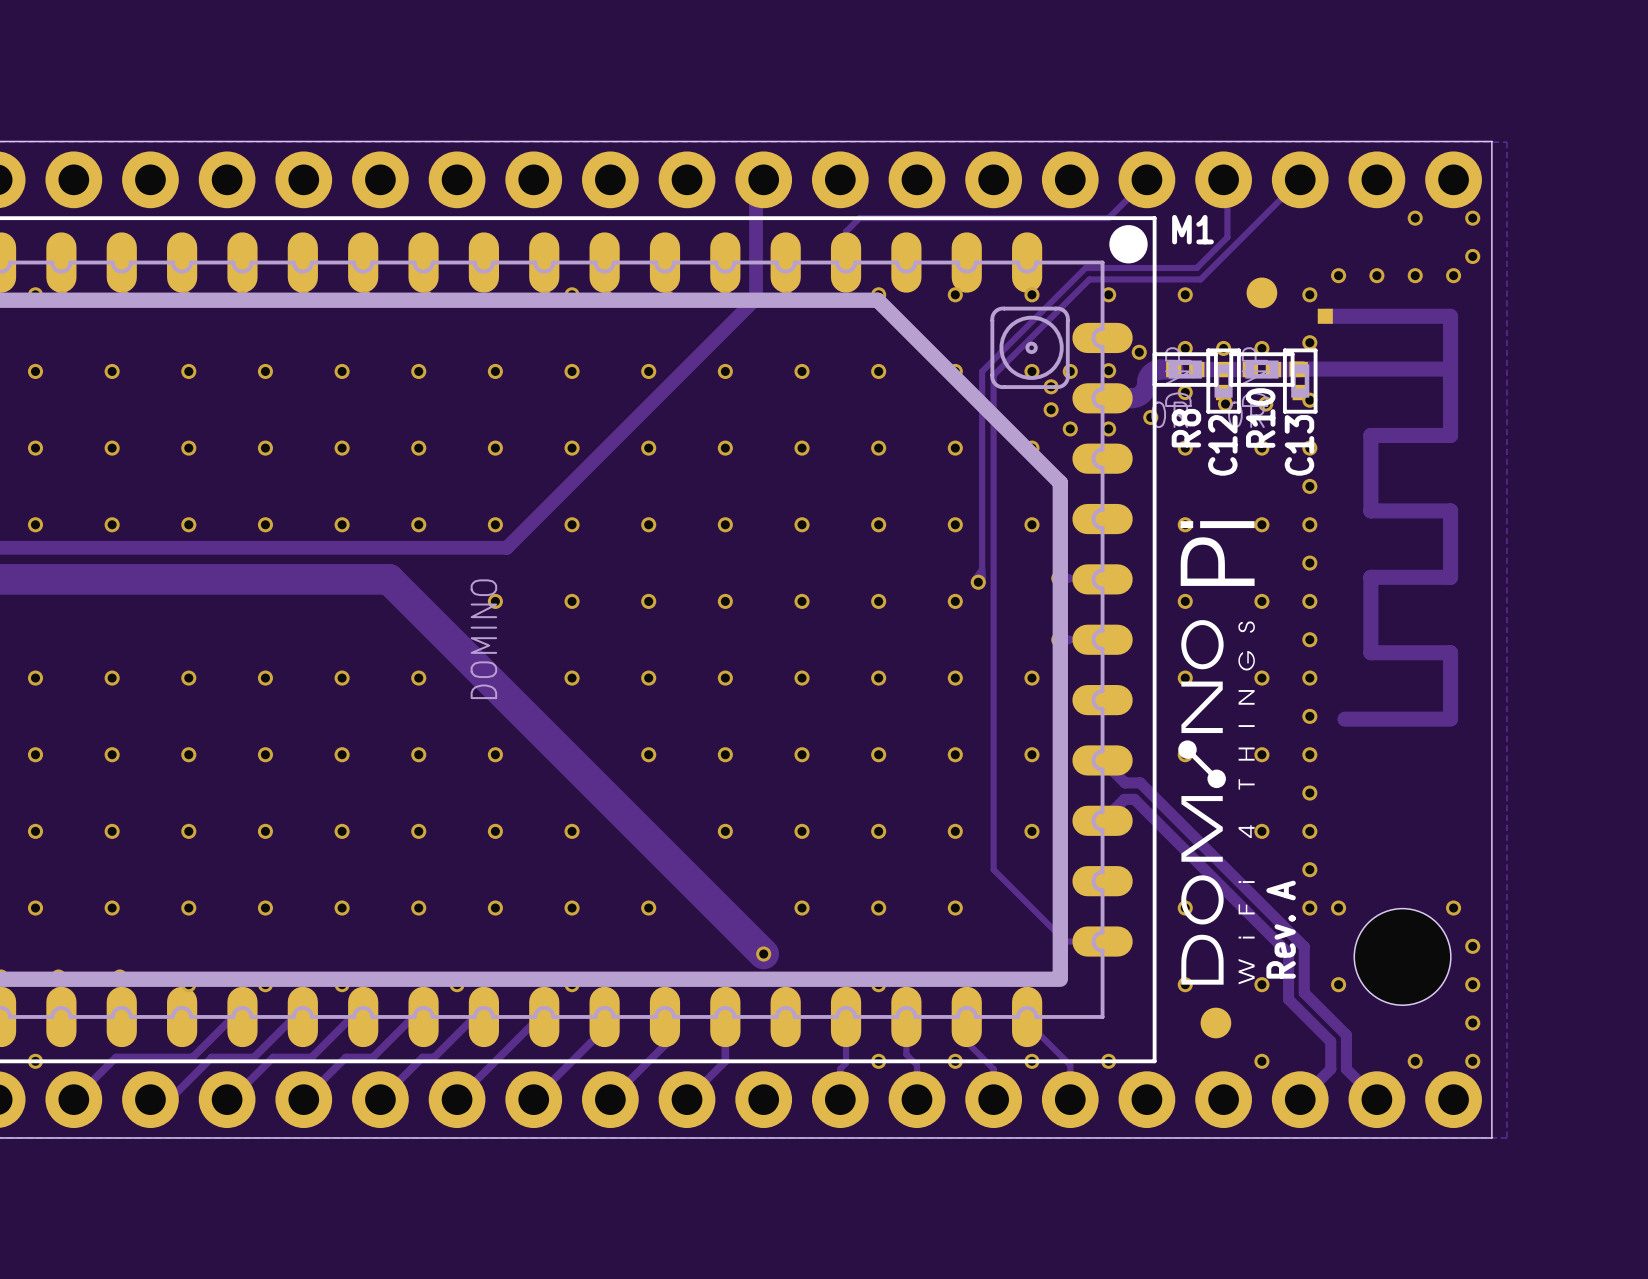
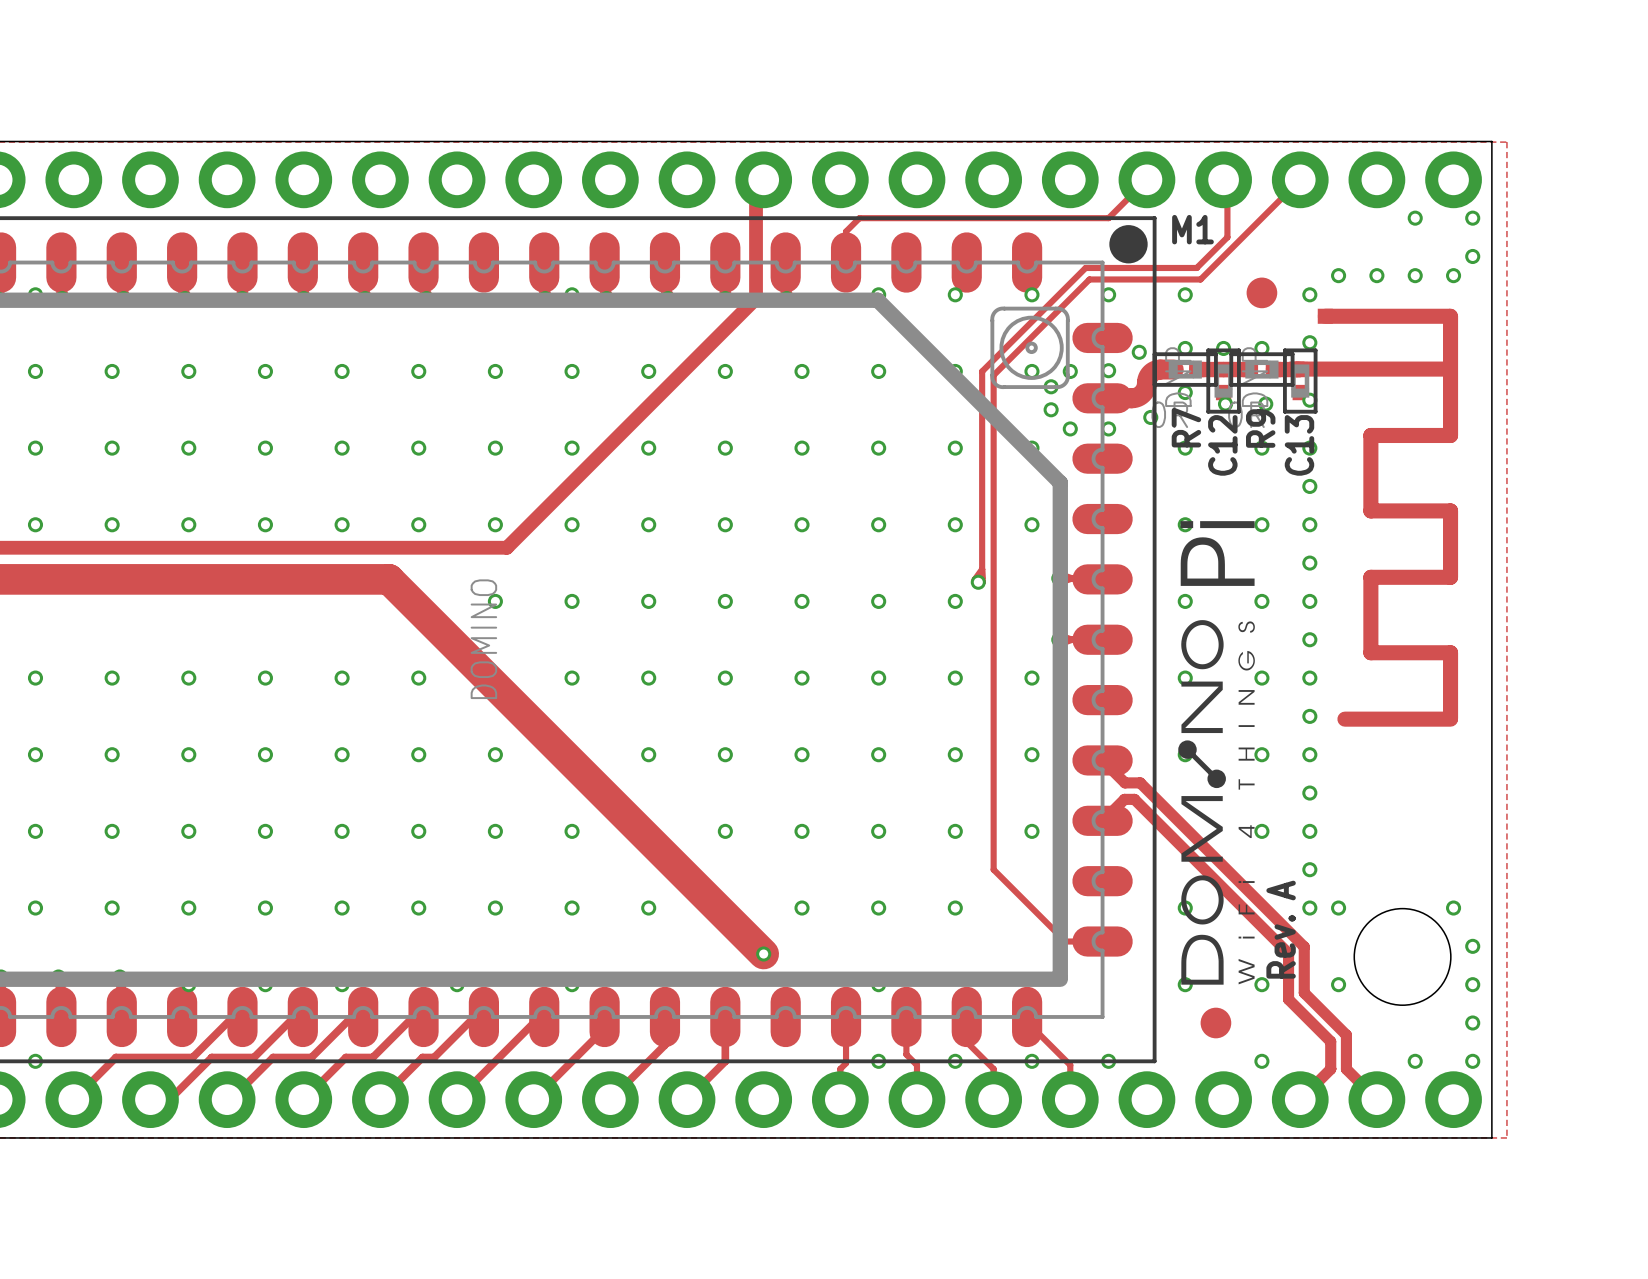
R10 name: R10 (1260, 417) -> R9 (1260, 428)
R8 name: R8 (1186, 428) -> R7 (1186, 427)

